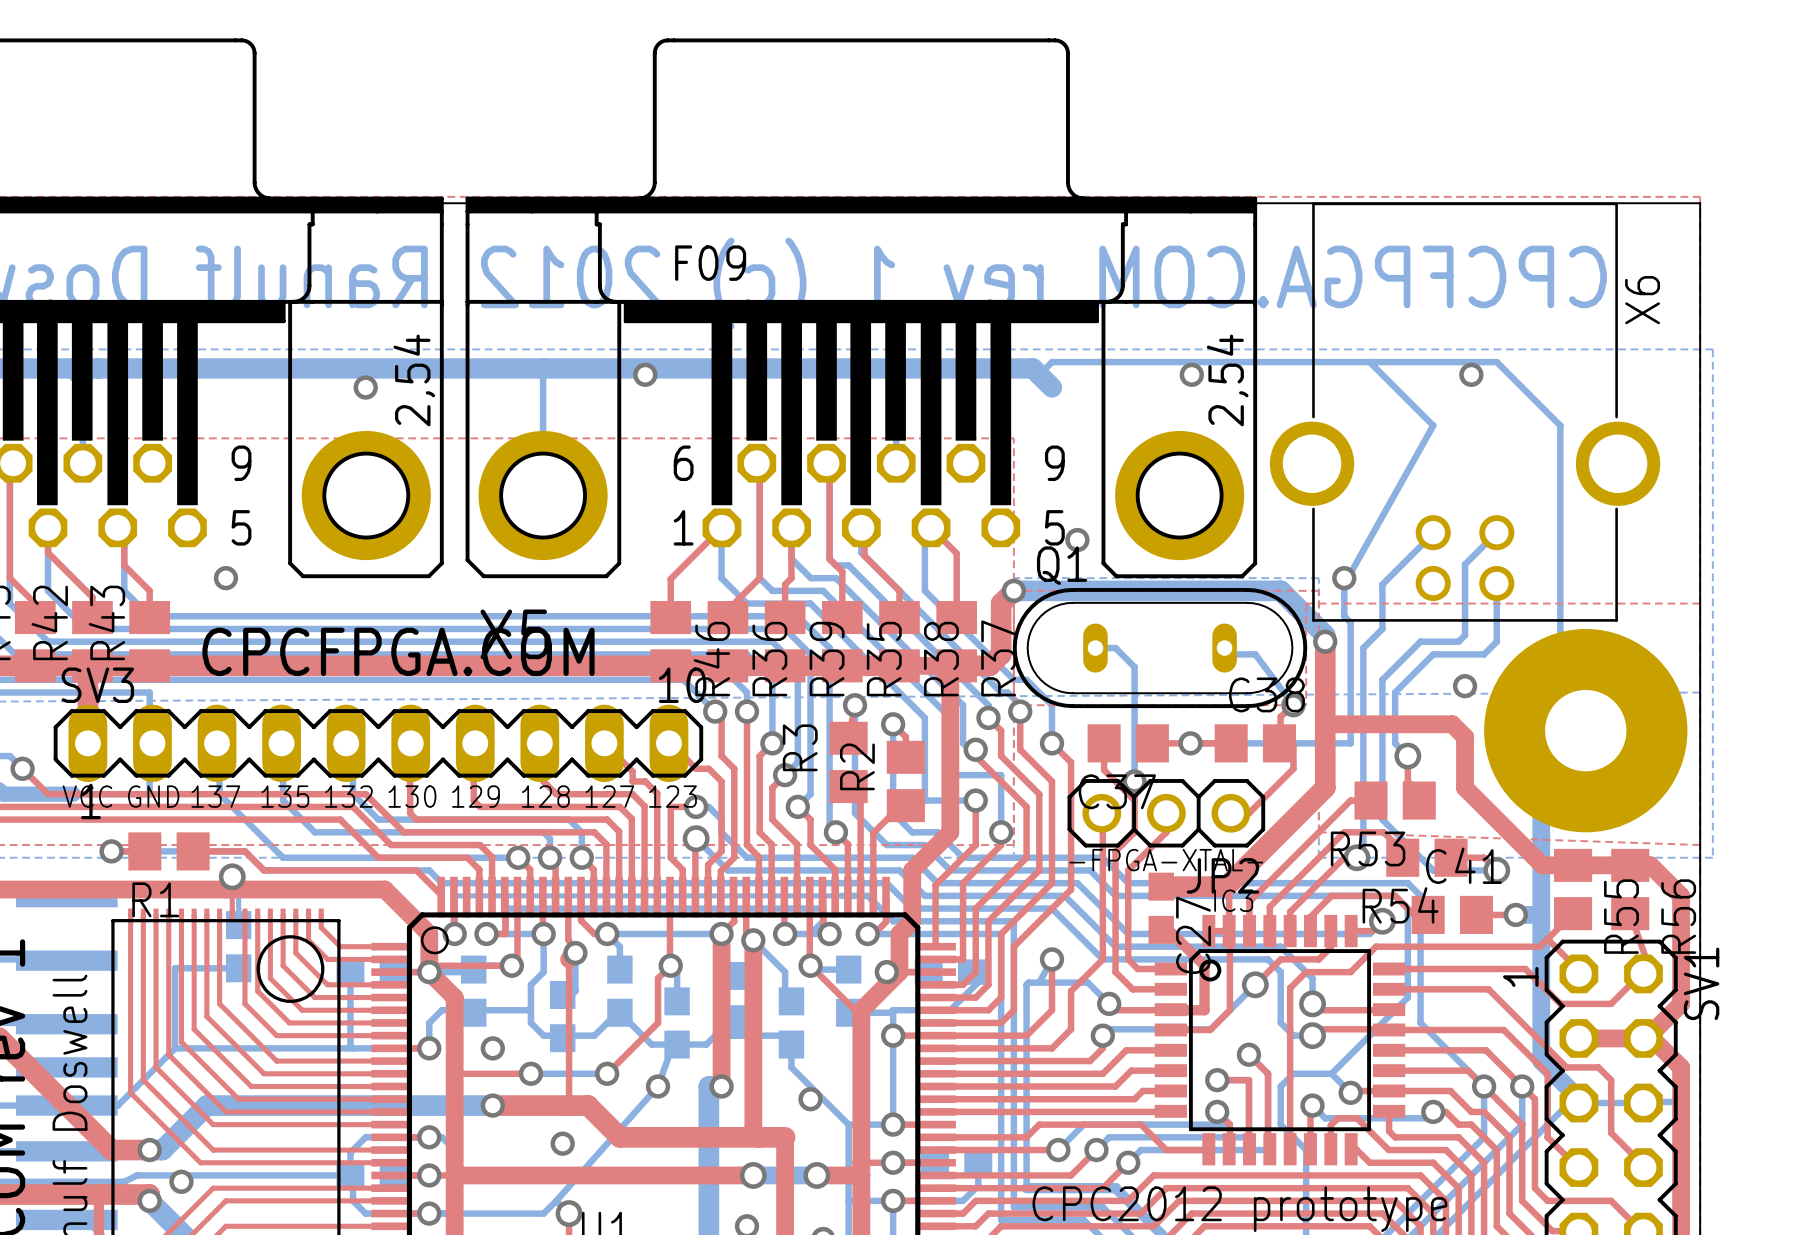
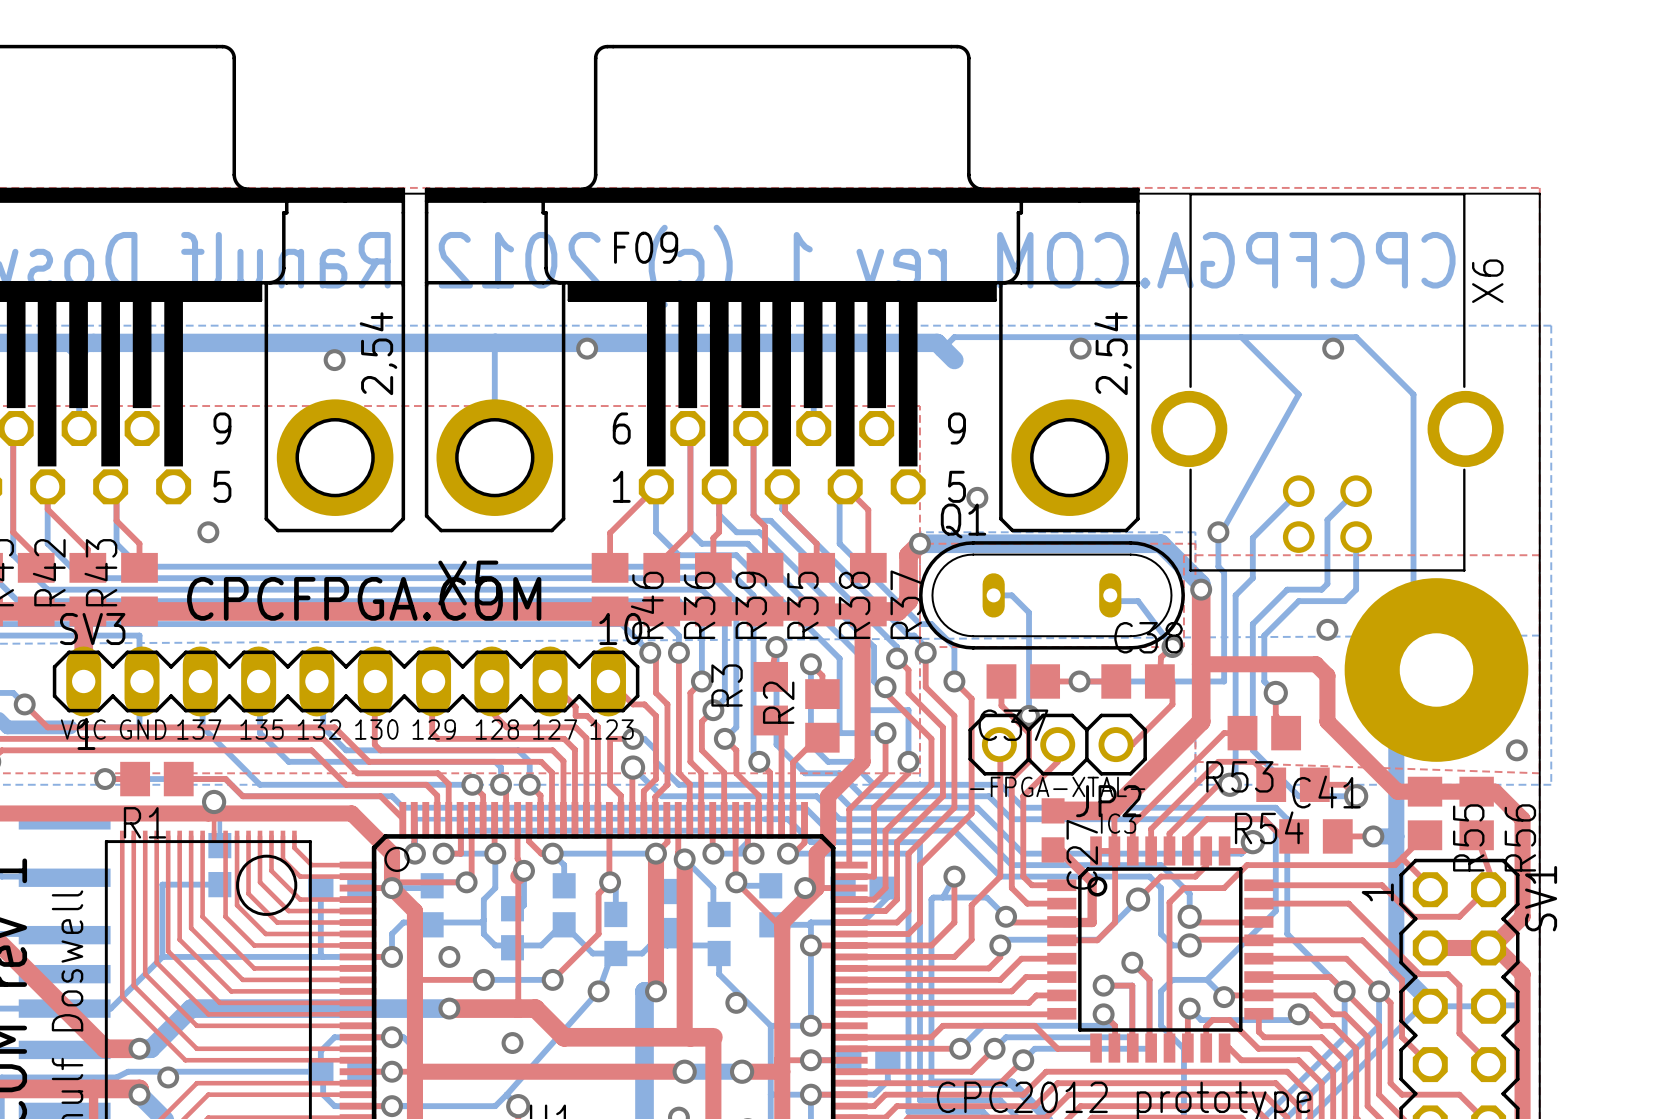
via: none -> (1516, 750)

